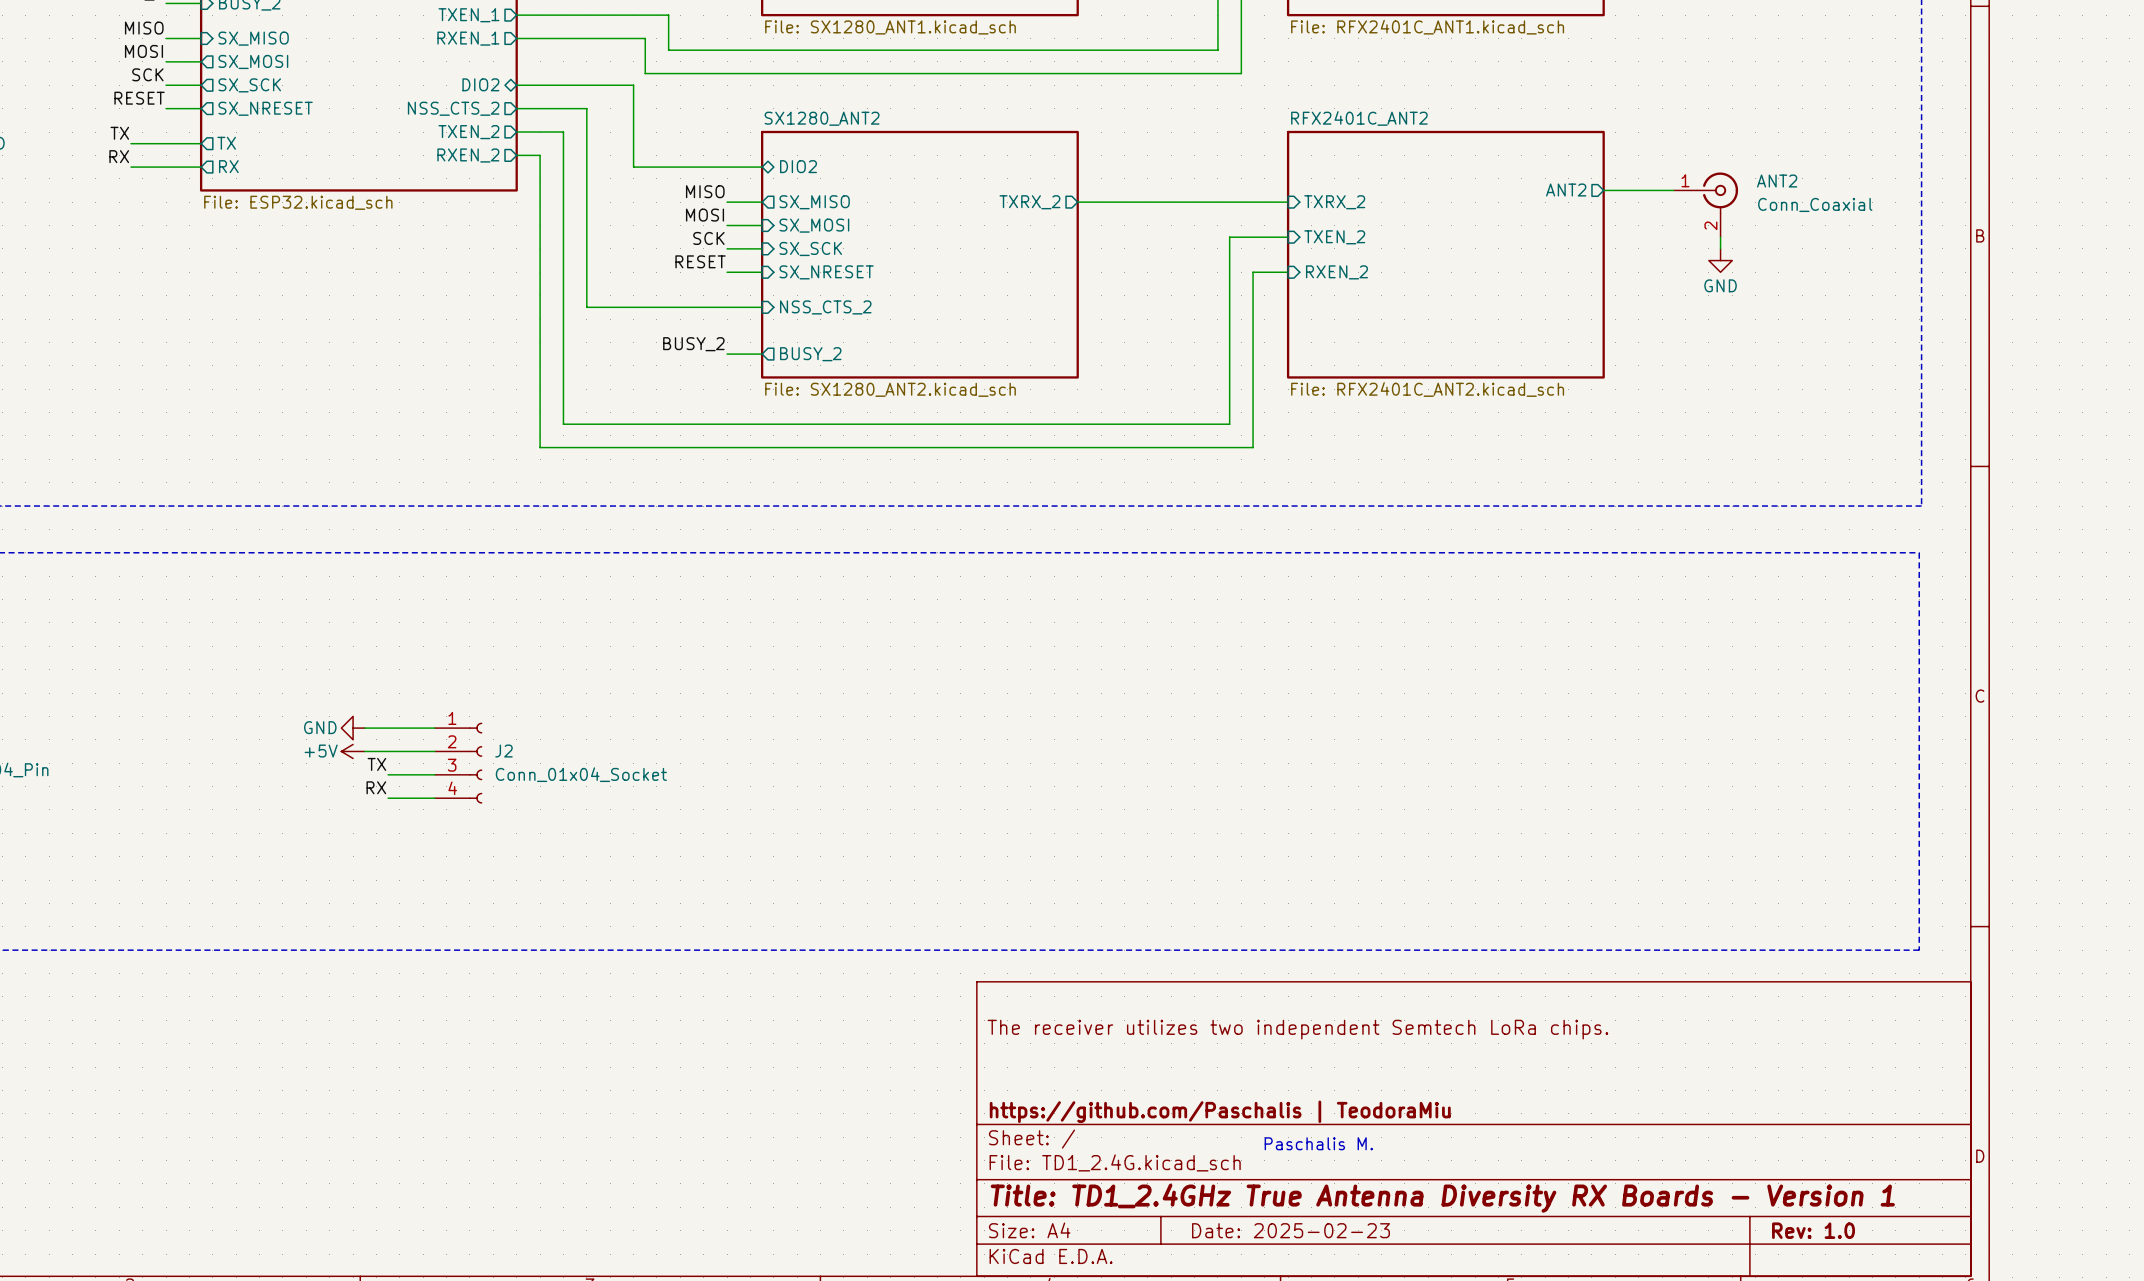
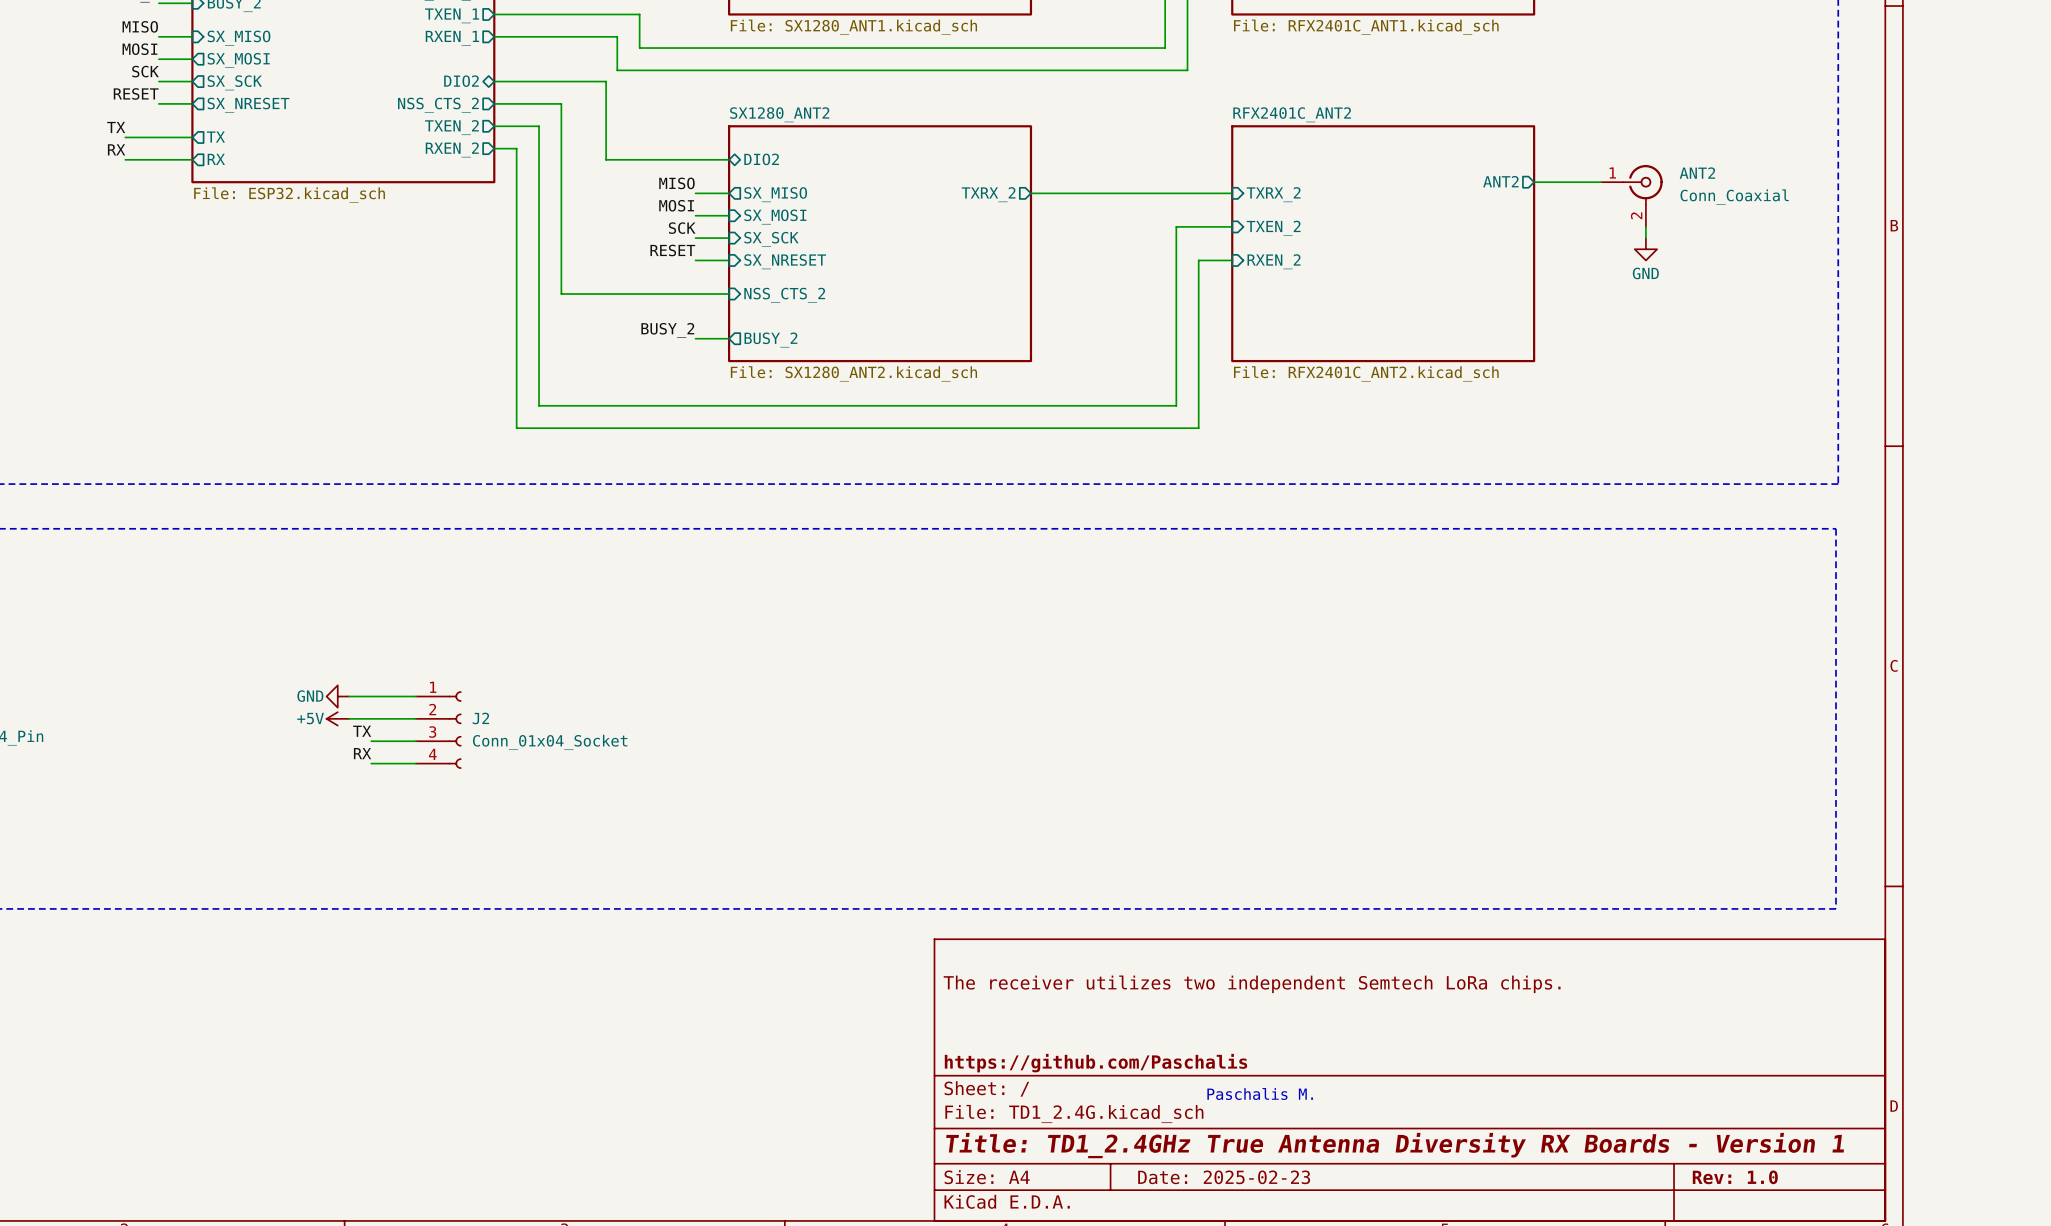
title block: https://github.com/Paschalis | TeodoraMiu (1220, 1111) -> https://github.com/Paschalis (1095, 1063)

